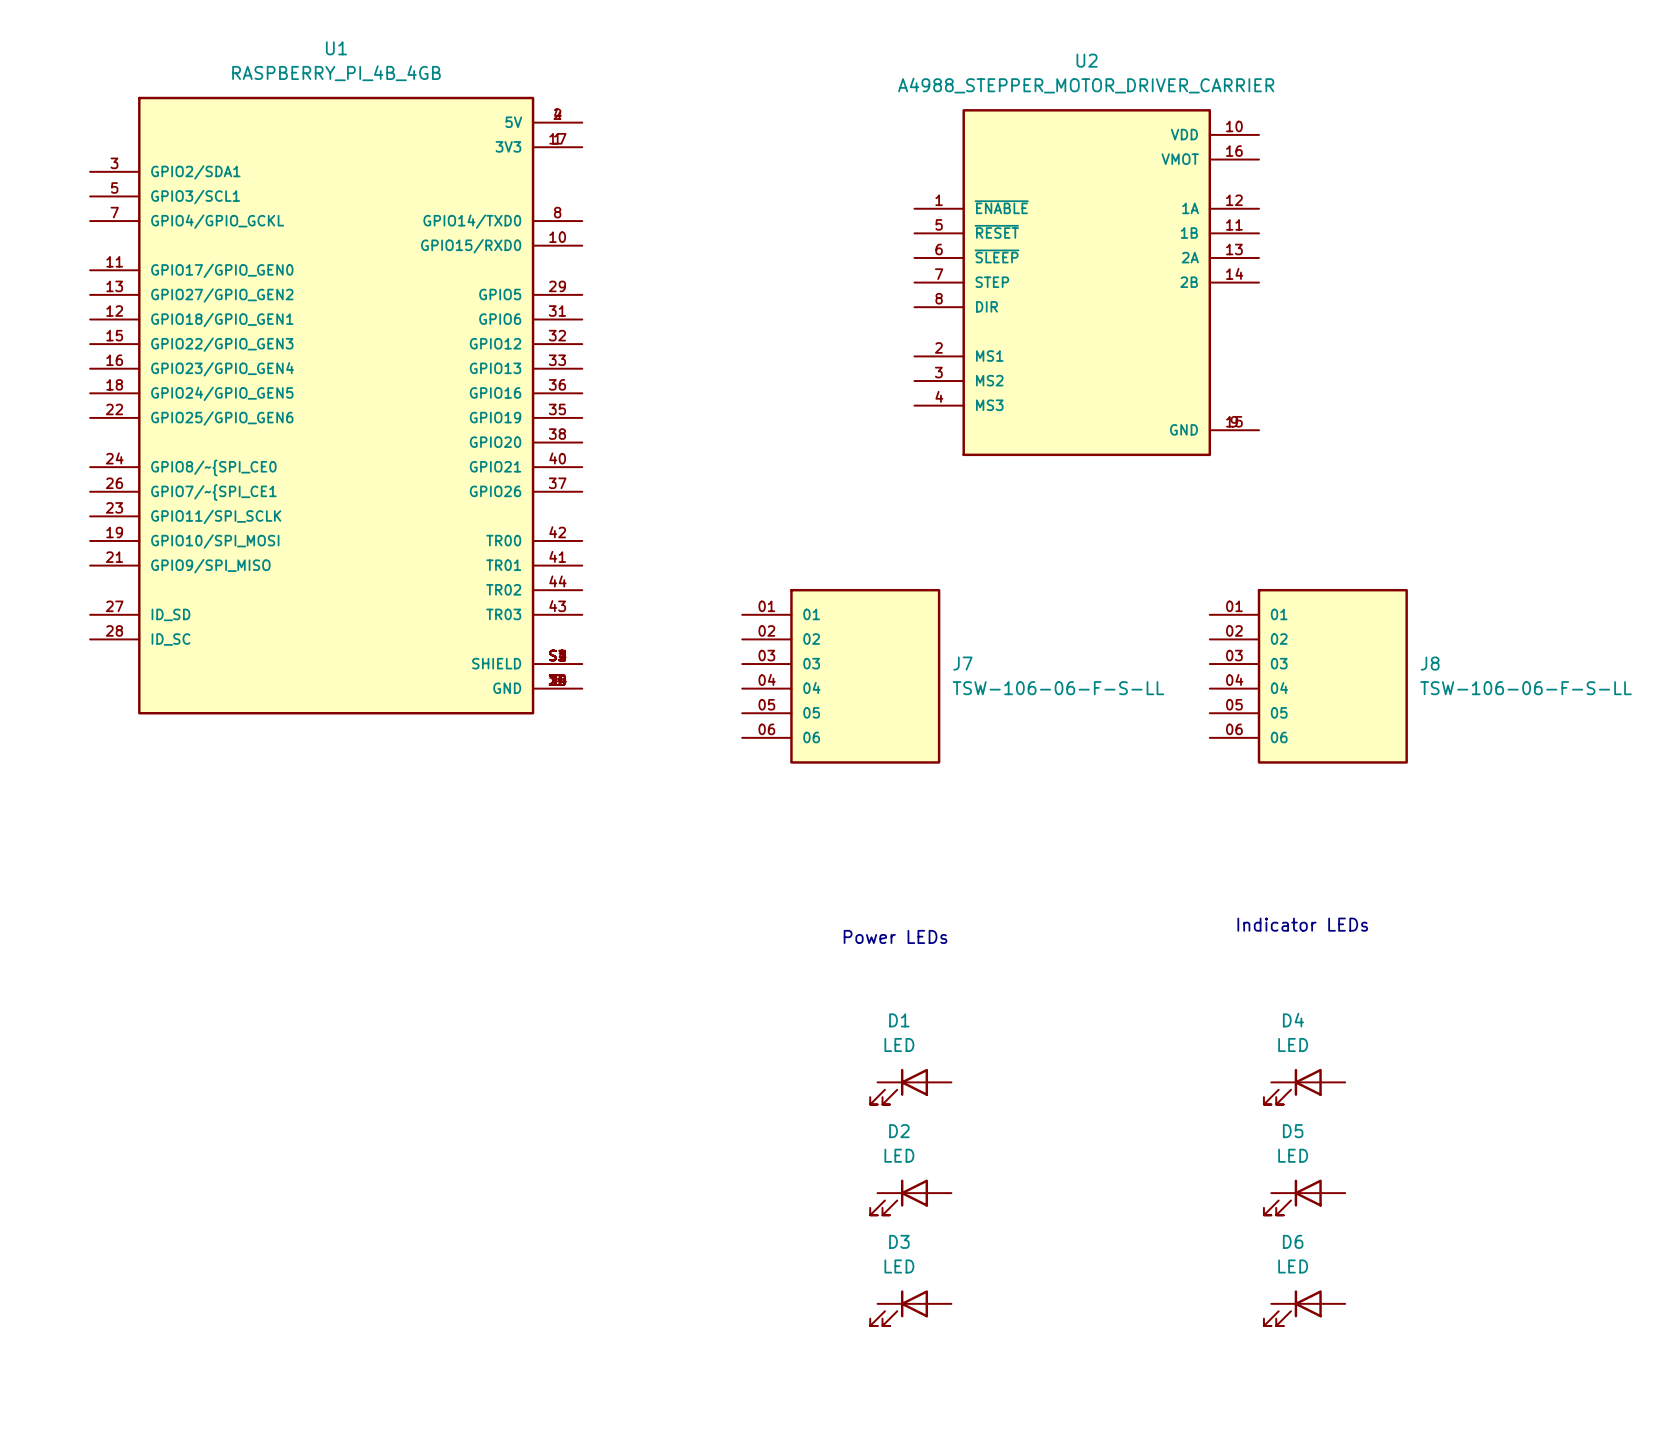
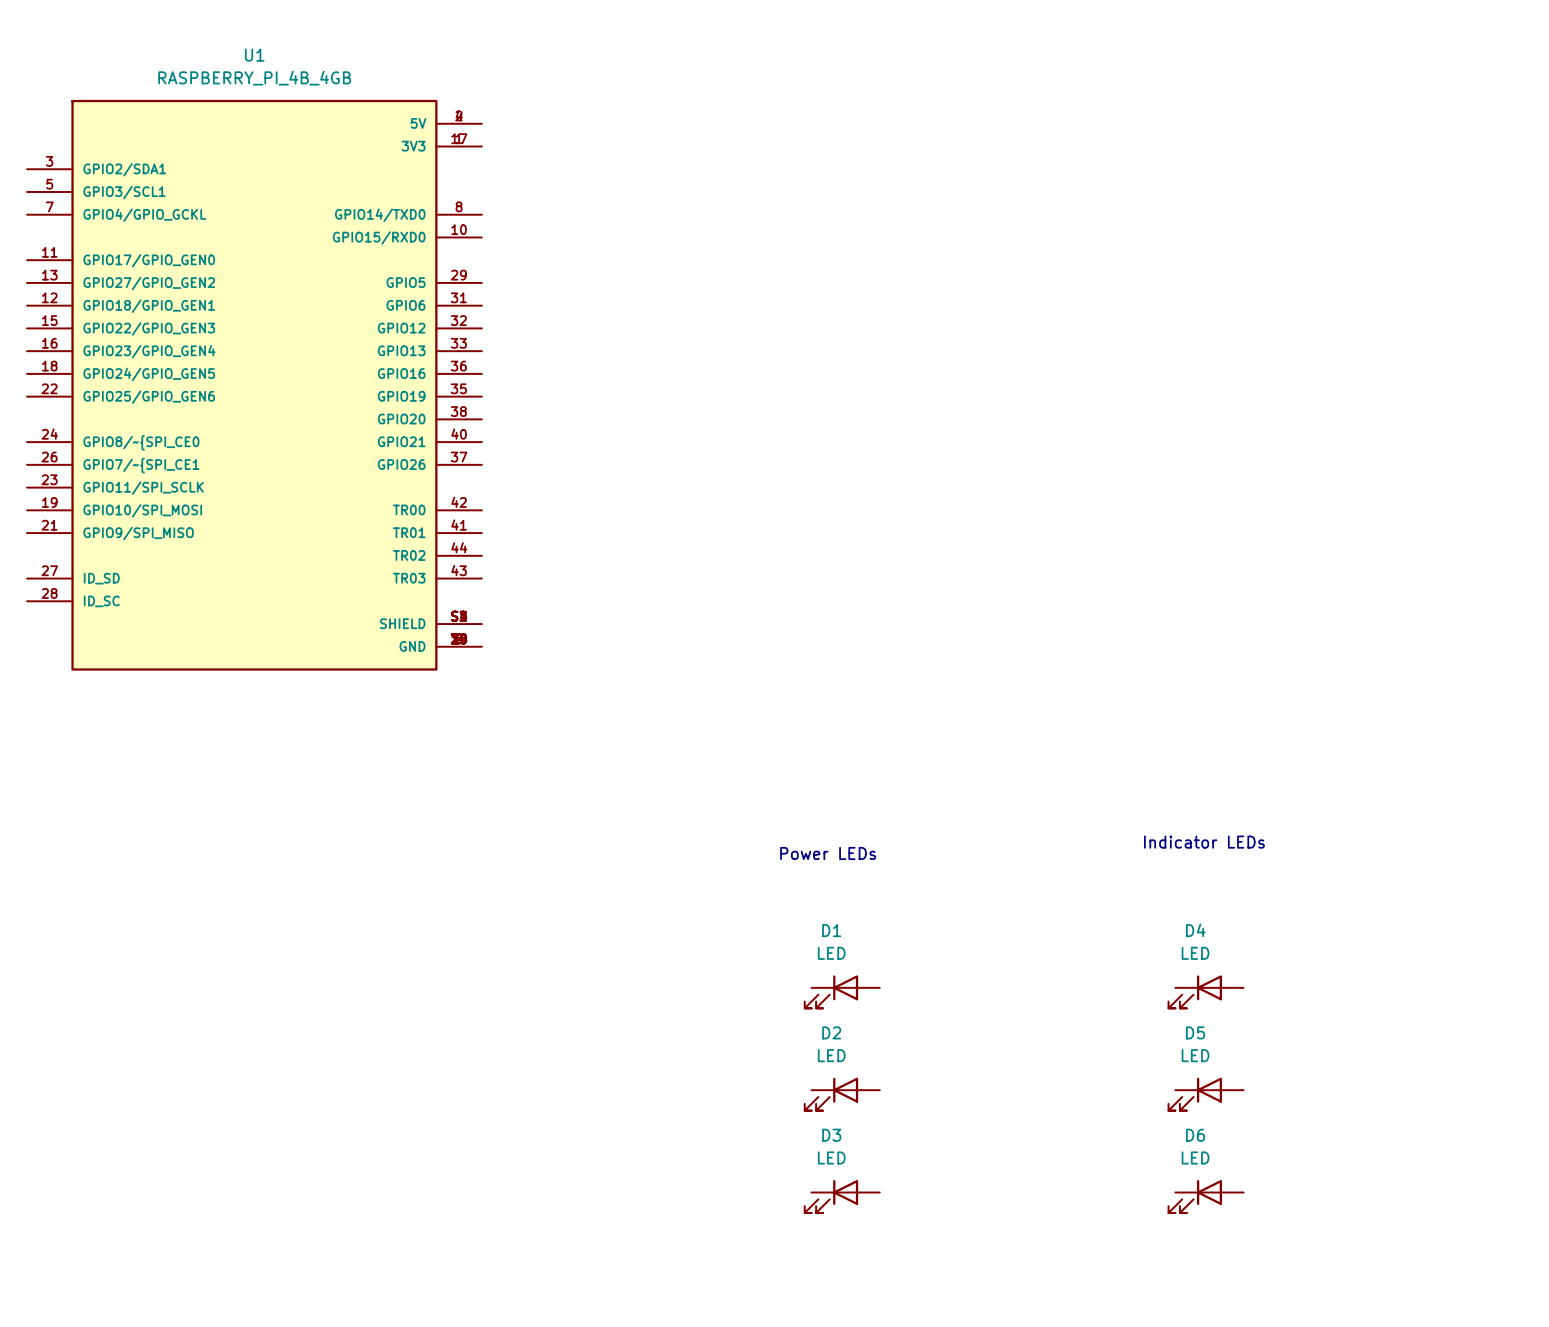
U2: A4988_STEPPER_MOTOR_DRIVER_CARRIER (1086, 282) -> none
U1 position: (336, 405) -> (254, 385)
J7: TSW-106-06-F-S-LL (841, 676) -> none
J8: TSW-106-06-F-S-LL (1308, 676) -> none

